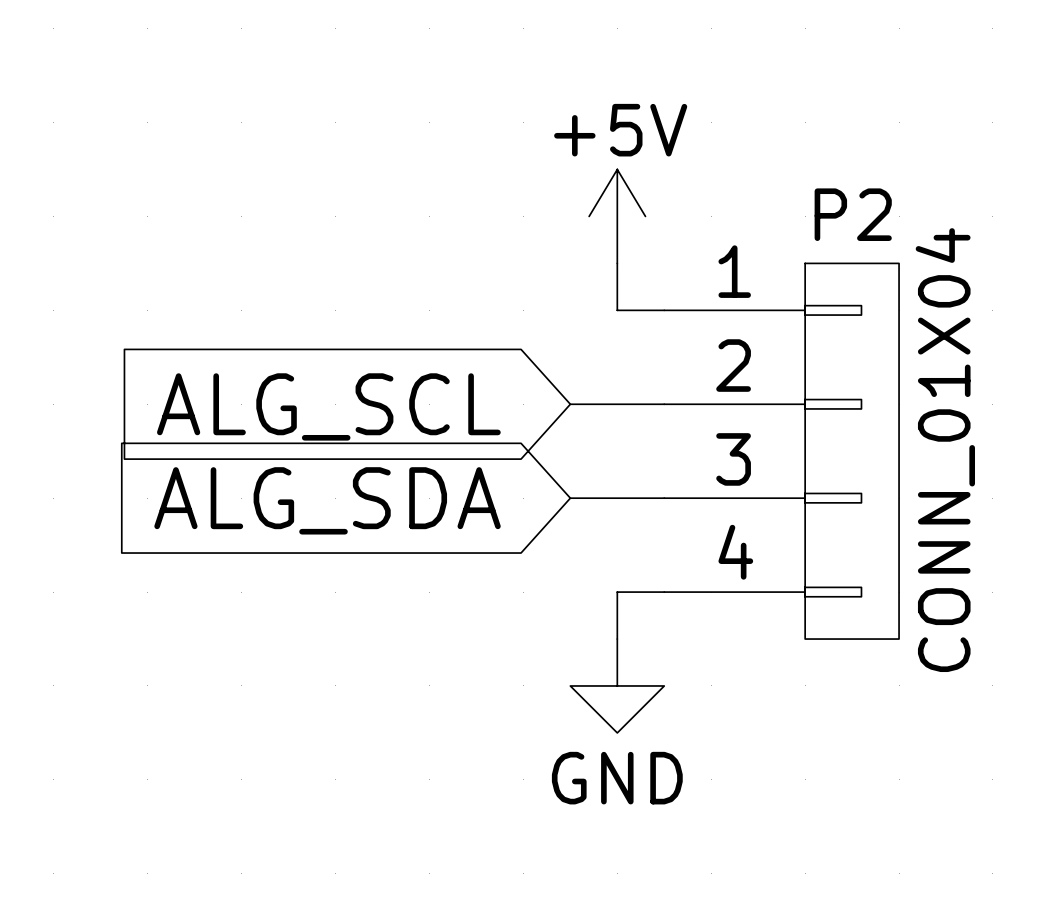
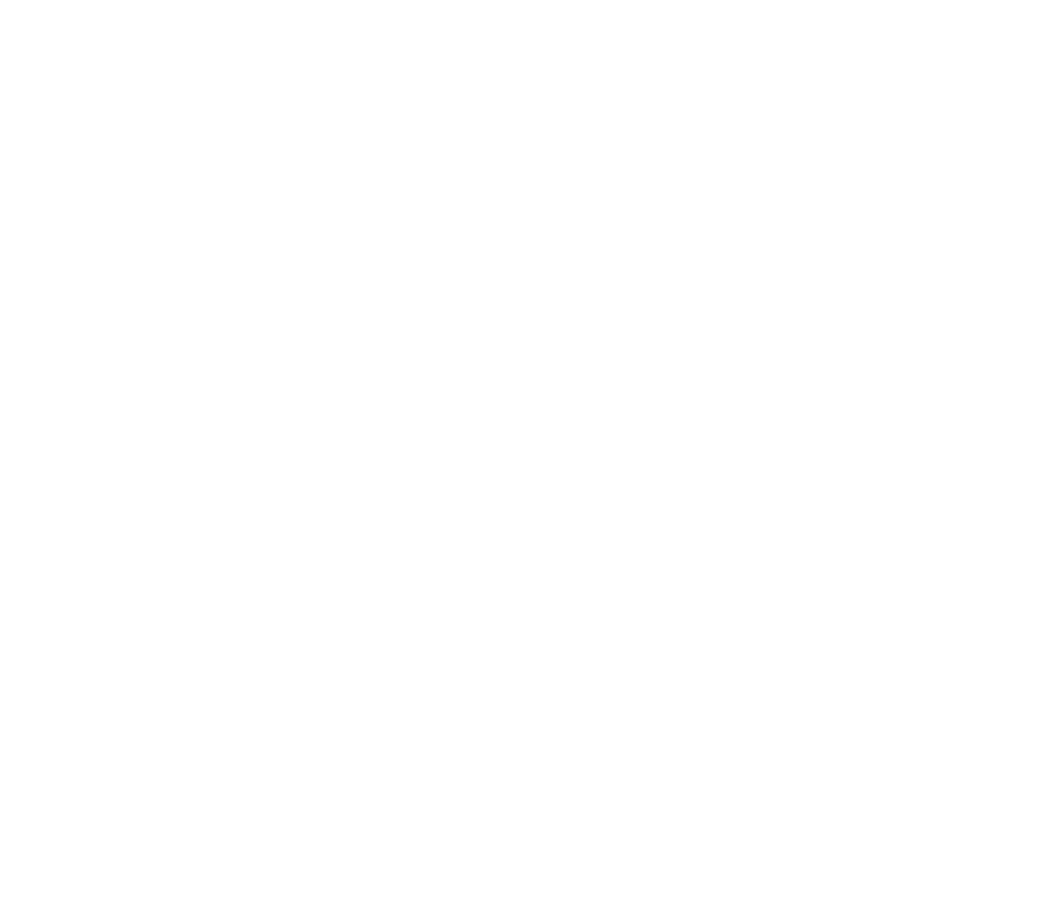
power symbol: +5V (617, 216) -> none
wire: (617, 263) (617, 310) (664, 310) -> none
wire: (570, 404) (664, 404) -> none
global label: ALG_SCL (328, 406) -> none
P2: CONN_01X04 (781, 451) -> none
wire: (570, 498) (664, 498) -> none
global label: ALG_SDA (327, 500) -> none
wire: (664, 592) (617, 592) (617, 639) -> none
power symbol: GND (617, 685) -> none

